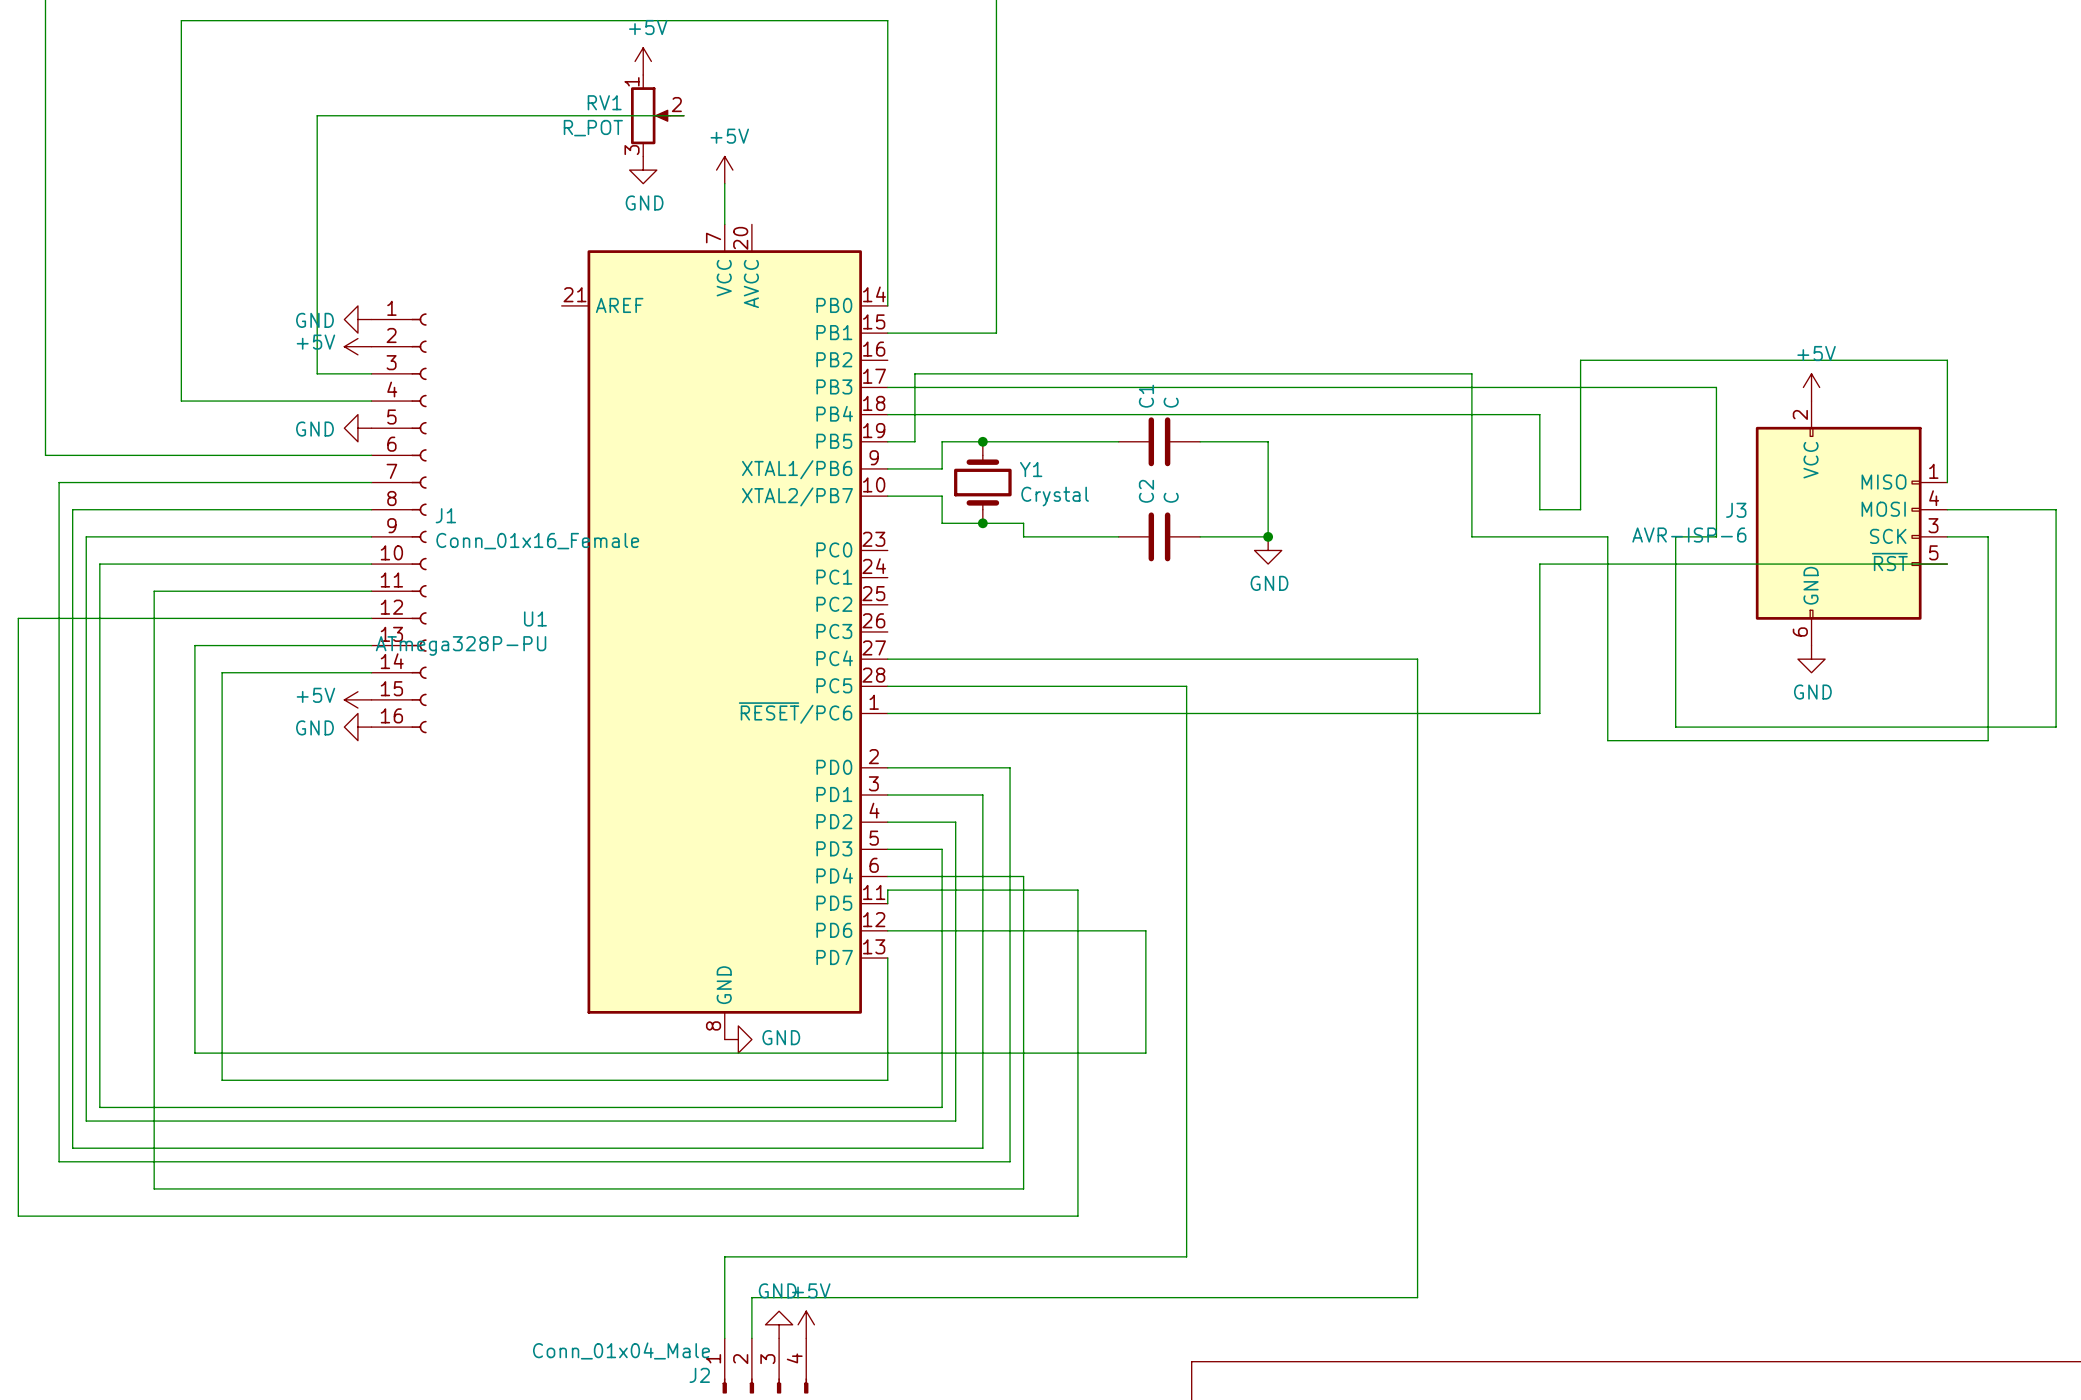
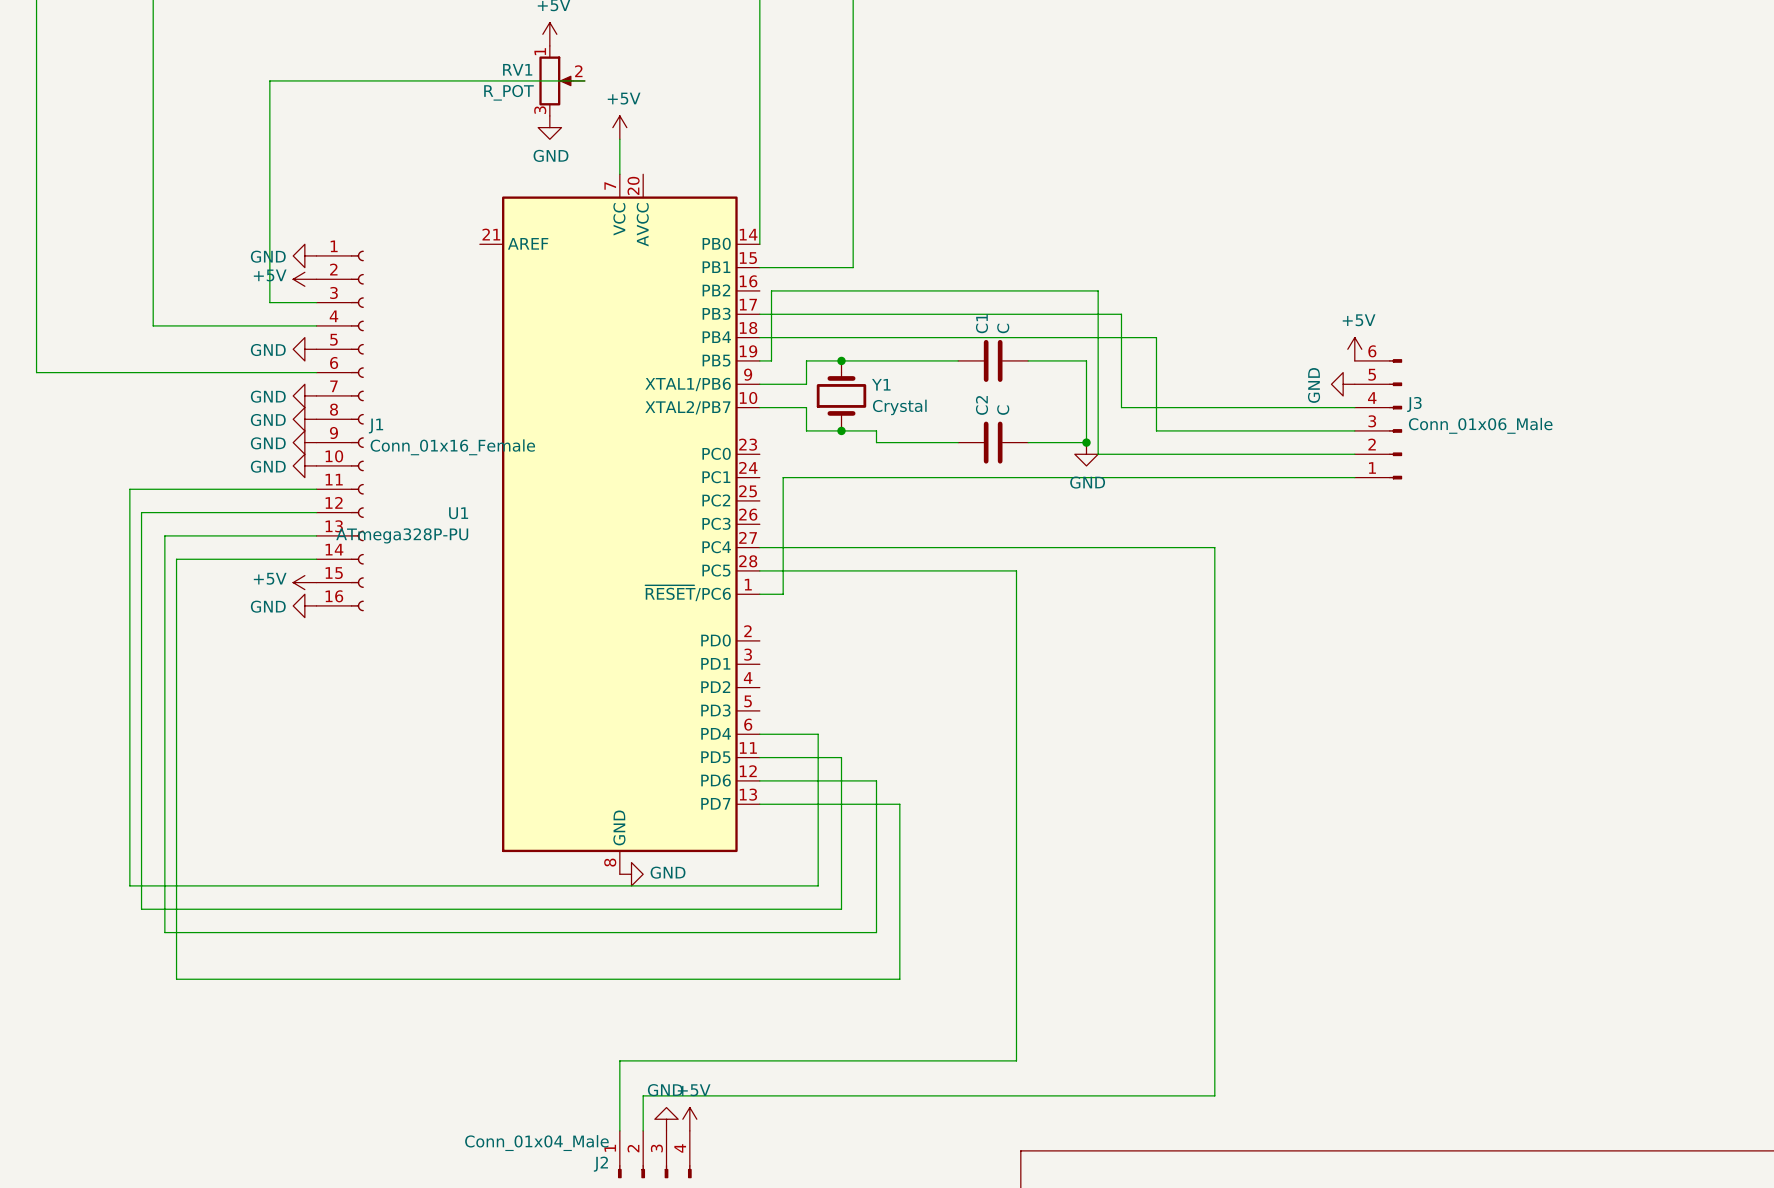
wire: (1308, 387) (1716, 387) (1716, 536) (1675, 536) (1675, 727) (2056, 727) (2056, 509) (1947, 509) -> (1121, 314) (1121, 407) (1354, 407)
power symbol position: +5V (1811, 387) -> +5V (1354, 349)
J3 symbol: [1755, 401, 1948, 646] -> [1354, 359, 1403, 480]
wire: (1349, 414) (1539, 414) (1539, 509) (1580, 509) (1580, 360) (1947, 360) (1947, 482) -> (1156, 337) (1156, 430) (1354, 430)
wire: (901, 441) (914, 441) (914, 373) (1471, 373) (1471, 536) (1607, 536) (1607, 740) (1988, 740) (1988, 536) (1947, 536) -> (771, 360) (771, 290) (1098, 290) (1098, 454) (1354, 454)
power symbol: none -> GND (1343, 384)
power symbol: none -> GND (304, 395)
wire: (371, 482) (59, 482) (59, 1161) (208, 1161) -> (188, 559) (176, 559) (176, 979)
power symbol: none -> GND (304, 419)
wire: (371, 509) (72, 509) (72, 1148) (982, 1148) (982, 1080) -> (759, 909) (841, 909)
J3 name position: J3 (1736, 510) -> J3 (1414, 404)
J3 value: AVR-ISP-6 (1689, 535) -> Conn_01x06_Male (1480, 425)
power symbol: none -> GND (304, 442)
wire: (371, 536) (86, 536) (86, 1121) (955, 1121) (955, 1053) (1145, 1053) (1145, 930) (1023, 930) (1023, 876) (955, 876) (955, 822) (887, 822) -> none
power symbol: none -> GND (304, 465)
wire: (371, 564) (99, 564) (99, 1107) (194, 1107) -> (129, 885) (164, 885) (164, 932)
wire: (1947, 564) (1539, 564) (1539, 713) (914, 713) -> (1354, 477) (783, 477) (783, 594)
wire: (167, 618) (18, 618) (18, 1216) (1077, 1216) (1077, 890) (887, 890) (887, 903) -> none
power symbol: GND (1811, 659) -> none
wire: (222, 672) (222, 1080) -> (141, 512) (141, 909) (188, 909)
wire: (887, 767) (1010, 767) (1010, 1161) -> none
wire: (887, 795) (982, 795) (982, 903) -> (759, 757) (841, 757)
wire: (887, 849) (942, 849) (942, 1107) -> (876, 932) (806, 932)
wire: (887, 958) (887, 1080) -> (759, 804) (899, 804) (899, 979) (864, 979)
wire: (154, 1053) (154, 1188) (1023, 1188) (1023, 1107) -> none

